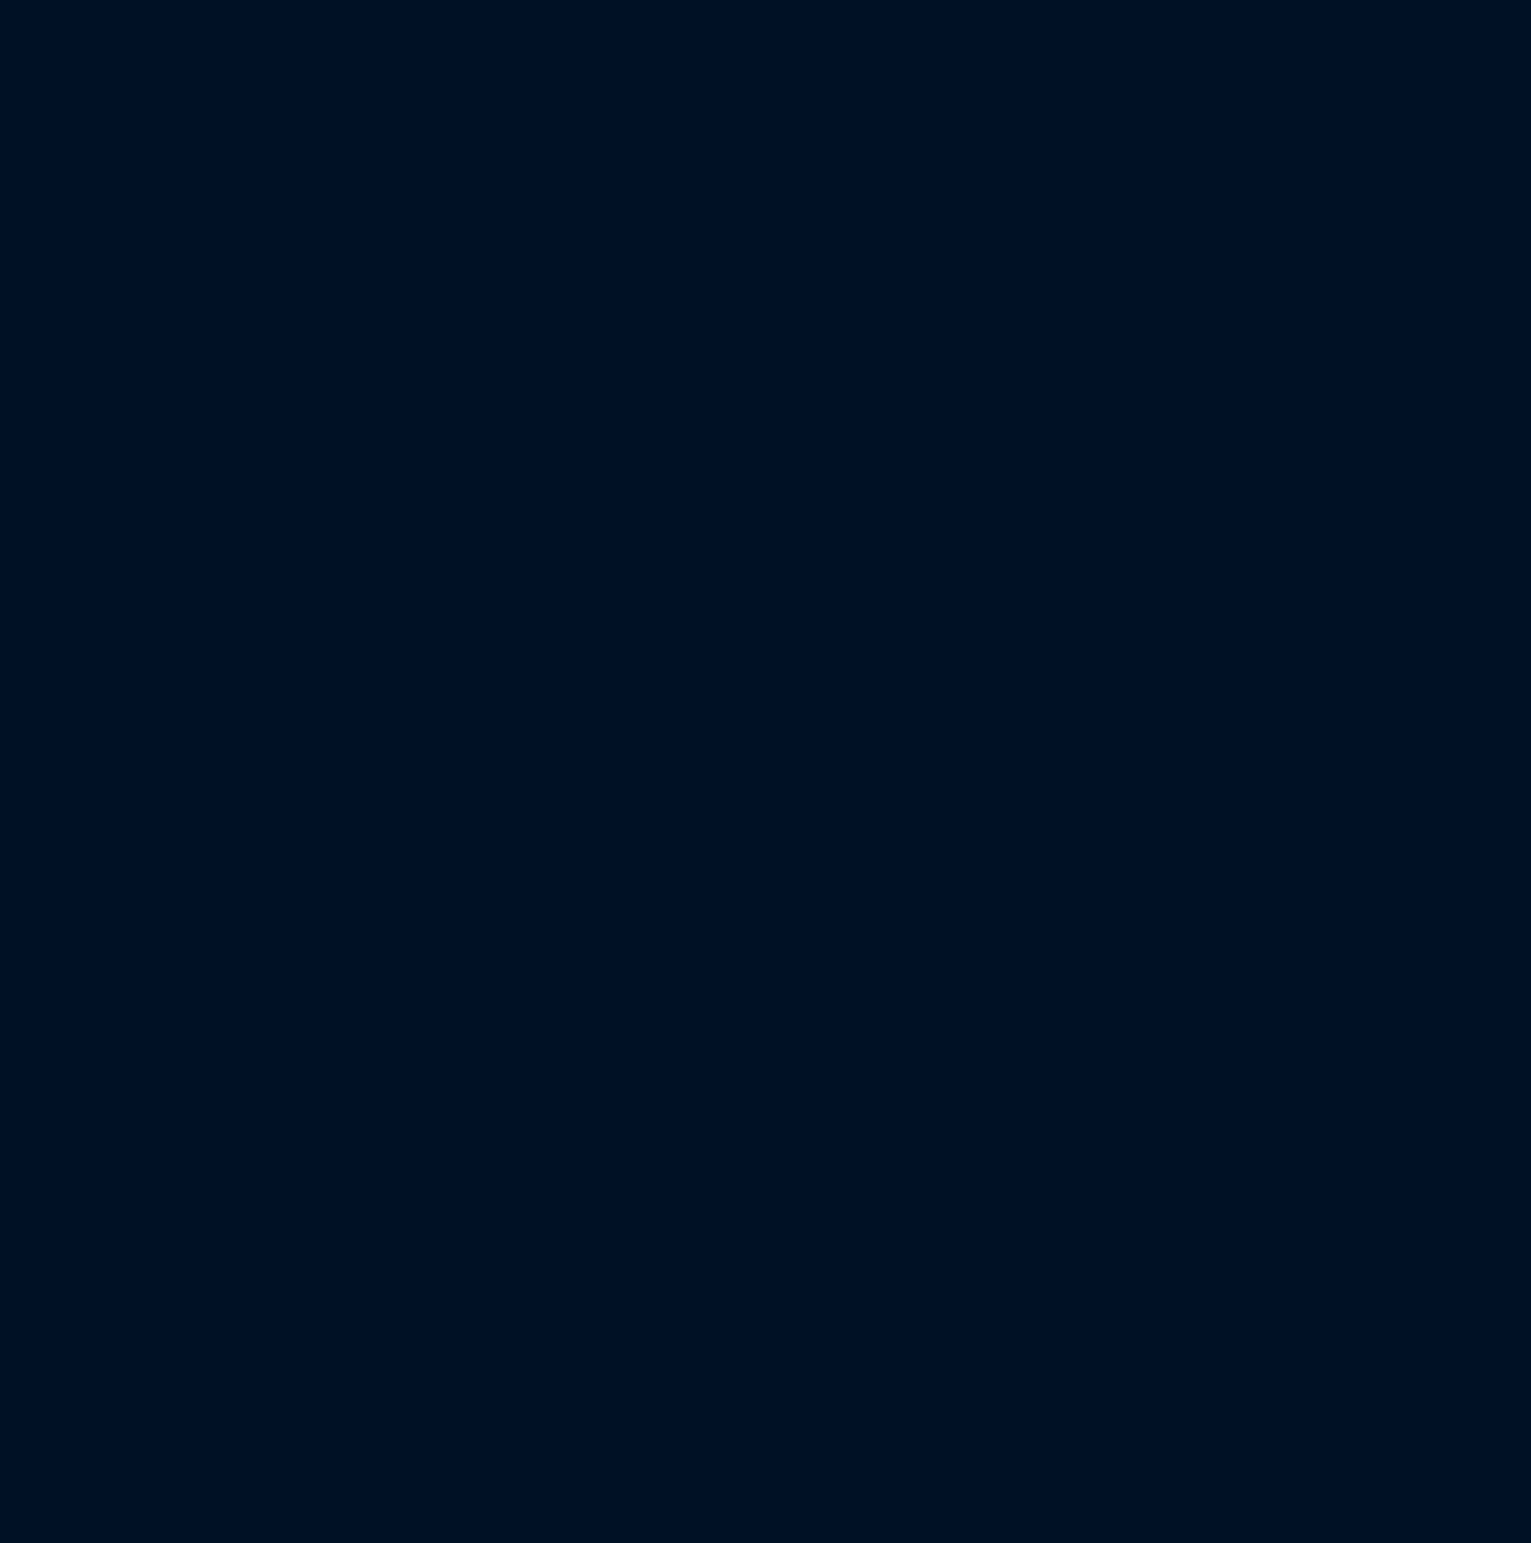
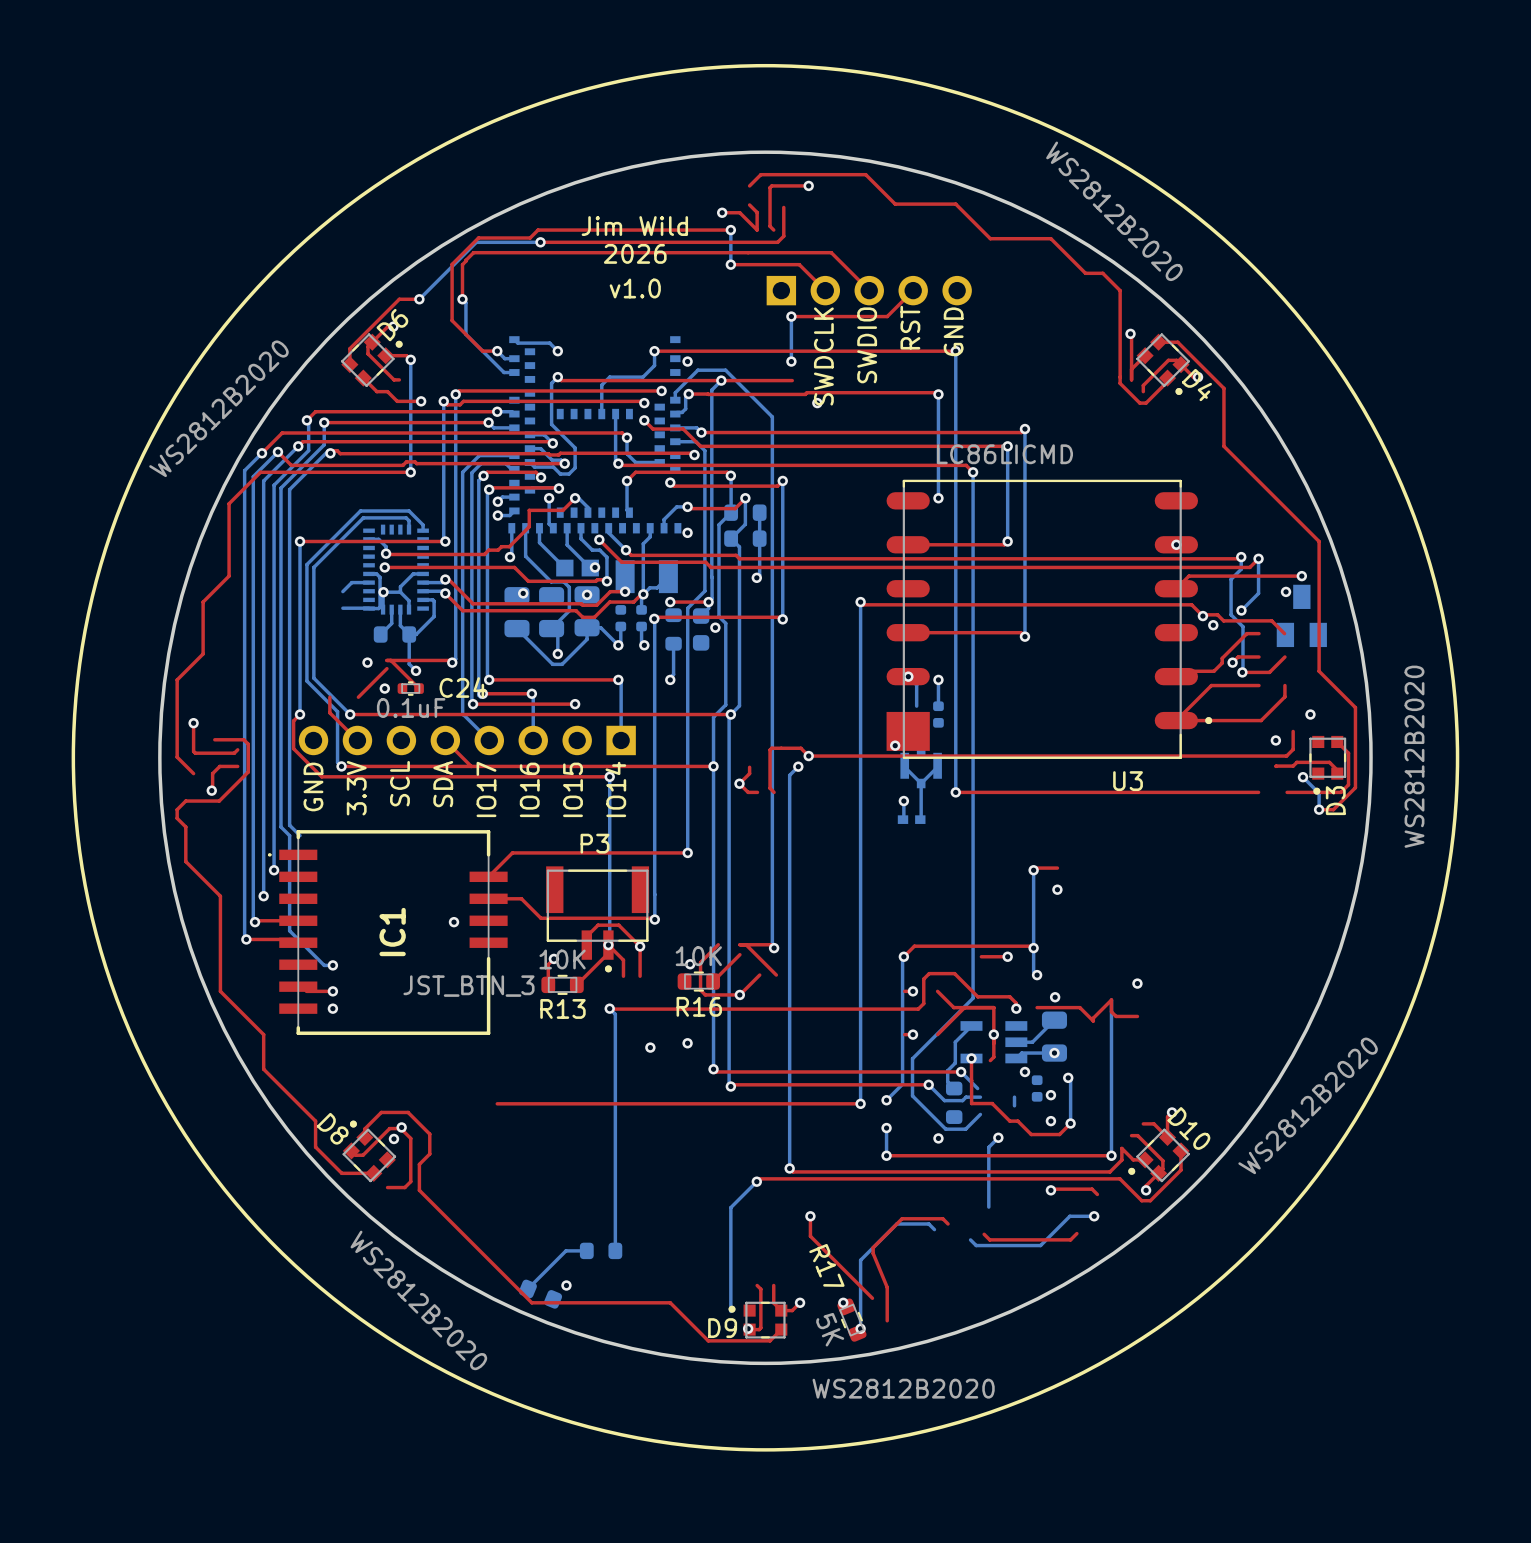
drawing: none -> [71, 63, 1460, 1452]
round board edge: none -> [158, 150, 1373, 1366]
top track: none -> (749, 185) (760, 174) (865, 174) (895, 204) (955, 204) (990, 238) (1050, 238) (1085, 273) (1102, 273) (1120, 290) (1120, 383) (1139, 403) (1146, 403) (1167, 381)
top track: none -> (808, 185) (771, 185) (770, 187) (770, 226) (773, 230)
via: none -> (808, 185)
top track: none -> (749, 204) (757, 212) (757, 230) (739, 212) (722, 212)
top track: none -> (783, 207) (783, 236) (777, 242) (540, 242)
via: none -> (722, 212)
text: none -> Jim Wild (634, 226)
top track: none -> (730, 230) (538, 230) (530, 238) (478, 238) (452, 264) (452, 320) (482, 351) (497, 351)
bottom track: none -> (730, 230) (730, 264)
via: none -> (730, 230)
bottom track: none -> (540, 242) (476, 242) (419, 299)
via: none -> (540, 242)
text: none -> 2026 (635, 253)
top track: none -> (730, 264) (799, 264) (825, 290)
via: none -> (730, 264)
text: none -> v1.0 (635, 288)
top track: none -> (869, 290) (831, 252) (473, 252) (462, 264) (462, 299)
part: none -> (869, 290)
top track: none -> (913, 290) (887, 316) (791, 316)
top track: none -> (419, 299) (399, 299) (349, 348) (349, 364)
via: none -> (419, 299)
bottom track: none -> (462, 299) (465, 302) (465, 334) (504, 372) (514, 372)
via: none -> (462, 299)
bottom track: none -> (791, 316) (791, 361)
via: none -> (791, 316)
top track: none -> (393, 326) (387, 326) (368, 346) (368, 353) (394, 379) (399, 379)
via: none -> (393, 326)
text: none -> RST (910, 327)
text: none -> GND (953, 331)
top track: none -> (1130, 333) (1131, 379)
via: none -> (1130, 333)
bottom track: none -> (515, 340) (517, 343) (549, 343) (557, 351)
top track: none -> (1158, 342) (1177, 342) (1223, 388) (1223, 446) (1319, 541) (1319, 671) (1355, 707) (1355, 787) (1333, 809) (1319, 809)
text: none -> SWDIO (867, 345)
bottom track: none -> (497, 351) (504, 358) (514, 358)
via: none -> (497, 351)
via: none -> (557, 351)
top track: none -> (654, 351) (955, 351)
bottom track: none -> (654, 351) (654, 365) (642, 377) (609, 377) (601, 385) (601, 414)
via: none -> (654, 351)
bottom track: none -> (955, 351) (955, 792)
via: none -> (955, 351)
top track: none -> (385, 355) (406, 355) (410, 359)
top track: none -> (1145, 355) (1131, 369)
text: none -> SWDCLK (823, 356)
bottom track: none -> (410, 359) (410, 472)
via: none -> (410, 359)
D6: none -> WS2812B2020 (371, 360)
via: none -> (687, 361)
via: none -> (791, 361)
D4: none -> WS2812B2020 (1163, 364)
top track: none -> (557, 377) (561, 380) (792, 380)
bottom track: none -> (557, 377) (551, 383) (551, 424) (575, 447) (575, 467) (569, 474) (560, 474) (553, 467) (534, 467) (529, 462)
via: none -> (557, 377)
top track: none -> (1198, 377) (1193, 377) (1176, 360) (1168, 360) (1143, 385) (1143, 391)
via: none -> (1198, 377)
top track: none -> (363, 378) (376, 391) (387, 391) (397, 401) (421, 401)
bottom track: none -> (721, 380) (711, 390) (712, 598) (708, 602) (708, 608) (701, 616)
via: none -> (721, 380)
top track: none -> (661, 390) (459, 390) (455, 394)
via: none -> (661, 390)
bottom track: none -> (455, 394) (455, 659) (452, 662)
via: none -> (455, 394)
top track: none -> (688, 394) (936, 392) (938, 394)
bottom track: none -> (688, 394) (685, 397) (685, 408) (682, 412) (676, 412)
via: none -> (688, 394)
bottom track: none -> (938, 394) (938, 498)
via: none -> (938, 394)
bottom track: none -> (675, 400) (675, 392) (697, 370) (725, 370) (772, 416) (772, 946) (774, 948)
via: none -> (421, 401)
top track: none -> (443, 401) (447, 404) (460, 404) (463, 401) (642, 401) (644, 403)
bottom track: none -> (443, 401) (443, 539) (445, 541)
via: none -> (443, 401)
via: none -> (644, 403)
via: none -> (817, 403)
top track: none -> (497, 411) (315, 411) (306, 420)
bottom track: none -> (497, 411) (512, 411) (514, 414)
via: none -> (497, 411)
bottom track: none -> (615, 414) (615, 460) (618, 463)
bottom track: none -> (306, 420) (308, 422) (308, 450) (274, 485) (274, 870)
via: none -> (306, 420)
top track: none -> (644, 420) (652, 429) (683, 429) (700, 446) (1007, 446)
via: none -> (644, 420)
top track: none -> (324, 422) (488, 422)
bottom track: none -> (324, 422) (324, 444) (280, 488) (280, 826) (289, 835) (289, 930) (324, 965) (332, 965)
via: none -> (324, 422)
bottom track: none -> (488, 422) (493, 427) (514, 427)
via: none -> (488, 422)
bottom track: none -> (675, 427) (696, 427) (701, 432)
top track: none -> (1024, 429) (1021, 432) (701, 432)
bottom track: none -> (1024, 429) (1024, 636)
via: none -> (1024, 429)
via: none -> (701, 432)
bottom track: none -> (529, 434) (544, 434) (552, 443)
part: none -> (594, 434)
top track: none -> (627, 437) (622, 433) (282, 433) (261, 453)
bottom track: none -> (627, 437) (627, 453) (635, 462) (659, 462)
via: none -> (627, 437)
bottom track: none -> (675, 441) (695, 441) (704, 450) (704, 591) (687, 608) (687, 852)
top track: none -> (552, 443) (551, 441) (302, 441) (298, 446)
via: none -> (552, 443)
bottom track: none -> (298, 446) (263, 480) (263, 896)
via: none -> (298, 446)
bottom track: none -> (1007, 446) (1007, 541)
via: none -> (1007, 446)
bottom track: none -> (529, 448) (540, 448) (552, 460) (561, 460) (564, 463)
top track: none -> (330, 450) (337, 450) (340, 453) (558, 454) (560, 453) (692, 453) (694, 454)
top track: none -> (277, 451) (291, 465) (402, 465) (406, 461) (416, 463) (564, 463)
bottom track: none -> (277, 451) (253, 476) (253, 920) (255, 922)
via: none -> (277, 451)
bottom track: none -> (261, 453) (244, 470) (244, 937) (246, 939)
via: none -> (261, 453)
bottom track: none -> (330, 453) (330, 450) (328, 450) (289, 489) (289, 825) (300, 835)
via: none -> (330, 453)
via: none -> (694, 454)
bottom track: none -> (514, 455) (479, 455) (462, 472) (462, 714) (489, 740)
via: none -> (564, 463)
top track: none -> (618, 463) (620, 465) (966, 465) (973, 472)
via: none -> (618, 463)
bottom track: none -> (511, 469) (505, 463) (481, 463) (471, 472) (473, 704)
top track: none -> (410, 472) (260, 472) (229, 503) (229, 576) (203, 602) (203, 653) (177, 679) (177, 757) (193, 773)
via: none -> (410, 472)
bottom track: none -> (973, 472) (973, 998) (912, 1058) (912, 1095) (945, 1129) (965, 1129) (980, 1114)
via: none -> (973, 472)
top track: none -> (483, 475) (487, 472) (535, 472) (541, 477)
bottom track: none -> (483, 475) (478, 480) (478, 695) (480, 696) (482, 693)
via: none -> (483, 475)
top track: none -> (730, 475) (727, 472) (635, 472) (627, 480)
bottom track: none -> (730, 475) (731, 512) (718, 524) (718, 616) (725, 623) (725, 704) (713, 717) (713, 1069)
via: none -> (730, 475)
via: none -> (541, 477)
bottom track: none -> (627, 480) (627, 510) (629, 512)
via: none -> (627, 480)
top track: none -> (782, 480) (777, 486) (673, 486) (670, 482)
bottom track: none -> (782, 480) (782, 619)
via: none -> (782, 480)
via: none -> (670, 482)
top track: none -> (558, 488) (490, 487) (489, 489)
via: none -> (558, 488)
bottom track: none -> (489, 489) (487, 491) (487, 678) (489, 679)
via: none -> (489, 489)
bottom track: none -> (514, 497) (502, 497) (497, 501)
bottom track: none -> (549, 498) (549, 524) (553, 528)
via: none -> (549, 498)
top track: none -> (575, 498) (563, 510) (529, 510) (529, 526) (509, 546) (501, 546) (498, 550) (488, 550) (484, 554) (386, 553)
bottom track: none -> (575, 498) (578, 498) (587, 507) (587, 512)
via: none -> (575, 498)
top track: none -> (745, 498) (735, 508) (689, 508) (687, 506)
bottom track: none -> (745, 498) (745, 524) (731, 538) (739, 547) (739, 705) (729, 716) (729, 1084) (730, 1086)
via: none -> (745, 498)
via: none -> (938, 498)
via: none -> (497, 501)
bottom track: none -> (687, 506) (676, 506) (664, 519) (664, 528)
via: none -> (687, 506)
bottom track: none -> (514, 510) (509, 515) (497, 515)
part: none -> (745, 512)
bottom track: none -> (759, 512) (759, 574) (756, 577)
via: none -> (497, 515)
bottom track: none -> (511, 528) (511, 555) (509, 557)
bottom track: none -> (525, 528) (525, 556) (551, 581) (563, 581) (569, 587) (569, 610) (551, 628)
bottom track: none -> (539, 528) (539, 542) (564, 568)
bottom track: none -> (567, 528) (567, 544) (590, 568)
bottom track: none -> (581, 528) (581, 538) (592, 550) (599, 550) (606, 557) (606, 581)
bottom track: none -> (608, 528) (608, 532) (625, 550)
bottom track: none -> (650, 528) (650, 536) (643, 543) (643, 594)
bottom track: none -> (409, 529) (409, 520) (406, 517) (363, 517) (313, 567) (313, 678) (350, 714)
bottom track: none -> (423, 530) (423, 525) (409, 510) (360, 510) (306, 564) (306, 681) (337, 711) (337, 762) (341, 766)
via: none -> (687, 532)
part: none -> (745, 538)
bottom track: none -> (369, 539) (378, 539) (386, 546) (386, 553)
top track: none -> (599, 539) (621, 562) (705, 562) (710, 567) (1249, 567) (1258, 558)
via: none -> (599, 539)
top track: none -> (300, 541) (445, 541)
bottom track: none -> (300, 541) (300, 714)
via: none -> (300, 541)
via: none -> (445, 541)
top track: none -> (1007, 541) (1004, 544) (908, 544)
via: none -> (1007, 541)
via: none -> (1176, 544)
top track: none -> (625, 550) (631, 555) (736, 555) (739, 558) (1239, 558) (1241, 557)
via: none -> (625, 550)
via: none -> (386, 553)
via: none -> (509, 557)
bottom track: none -> (1241, 557) (1241, 569) (1231, 579) (1231, 614) (1242, 626) (1242, 672)
via: none -> (1241, 557)
bottom track: none -> (1258, 558) (1258, 593) (1241, 610)
via: none -> (1258, 558)
top track: none -> (384, 567) (514, 567) (528, 581) (597, 579) (606, 581)
via: none -> (384, 567)
via: none -> (595, 567)
part: none -> (577, 568)
part: none -> (396, 569)
bottom track: none -> (369, 573) (376, 573) (380, 577) (380, 607) (369, 608)
bottom track: none -> (423, 573) (413, 573) (400, 586) (400, 592)
part: none -> (646, 576)
bottom track: none -> (668, 576) (657, 587) (649, 587) (641, 596) (641, 609)
top track: none -> (1301, 576) (1189, 576) (1176, 588)
via: none -> (1301, 576)
via: none -> (756, 577)
top track: none -> (445, 579) (448, 579) (473, 603) (596, 605) (610, 591) (625, 591)
bottom track: none -> (445, 579) (442, 582) (423, 582)
via: none -> (445, 579)
via: none -> (606, 581)
bottom track: none -> (369, 582) (351, 582) (342, 591)
bottom track: none -> (423, 591) (443, 591) (445, 593)
via: none -> (625, 591)
via: none -> (1286, 591)
via: none -> (383, 592)
bottom track: none -> (400, 592) (409, 600) (409, 609)
bottom track: none -> (400, 592) (383, 592) (383, 609)
top track: none -> (445, 593) (462, 610) (576, 610) (582, 617) (594, 617) (609, 602) (633, 602) (643, 594)
via: none -> (445, 593)
via: none -> (523, 593)
via: none -> (587, 594)
via: none -> (643, 594)
bottom track: none -> (423, 599) (434, 601) (434, 616) (416, 634) (409, 634)
top track: none -> (670, 602) (708, 602)
via: none -> (670, 602)
via: none -> (708, 602)
top track: none -> (860, 602) (863, 604) (1191, 604) (1202, 616) (1217, 614) (1223, 620) (1271, 620) (1284, 633)
bottom track: none -> (860, 602) (860, 1103)
via: none -> (860, 602)
bottom track: none -> (342, 608) (368, 608)
bottom track: none -> (391, 609) (391, 623) (380, 634)
bottom track: none -> (400, 609) (400, 625) (409, 634)
via: none -> (1241, 610)
part: none -> (587, 611)
part: none -> (516, 612)
part: none -> (551, 612)
part: none -> (1301, 615)
via: none -> (1202, 616)
part: none -> (620, 618)
part: none -> (641, 618)
top track: none -> (654, 618) (655, 617) (780, 617) (782, 619)
bottom track: none -> (654, 618) (654, 894)
via: none -> (654, 618)
via: none -> (782, 619)
U3: none -> LC86LICMD (1049, 619)
via: none -> (1213, 625)
bottom track: none -> (620, 626) (620, 642) (618, 645) (600, 627) (587, 627) (587, 639) (562, 664) (552, 664) (516, 628)
bottom track: none -> (641, 626) (641, 642) (644, 645)
via: none -> (715, 627)
part: none -> (673, 629)
part: none -> (701, 629)
top track: none -> (908, 632) (1021, 632) (1024, 636)
top track: none -> (1258, 633) (1246, 633) (1222, 658) (1222, 663) (1213, 671) (1181, 671)
part: none -> (394, 634)
bottom track: none -> (409, 634) (409, 664) (416, 670)
bottom track: none -> (557, 634) (557, 653)
via: none -> (1024, 636)
bottom track: none -> (673, 643) (673, 674) (670, 679)
via: none -> (618, 645)
via: none -> (644, 645)
via: none -> (557, 653)
top track: none -> (1258, 656) (1238, 656) (1232, 662)
top track: none -> (1284, 656) (1269, 672) (1242, 672)
top track: none -> (386, 660) (450, 660) (452, 662)
top track: none -> (390, 660) (419, 688)
via: none -> (367, 662)
via: none -> (452, 662)
via: none -> (1232, 662)
top track: none -> (386, 668) (358, 697)
via: none -> (416, 670)
via: none -> (1242, 672)
bottom track: none -> (908, 676) (916, 684) (916, 706)
via: none -> (908, 676)
top track: none -> (489, 679) (618, 679)
via: none -> (489, 679)
bottom track: none -> (618, 679) (621, 682) (621, 740)
via: none -> (618, 679)
via: none -> (670, 679)
bottom track: none -> (938, 679) (938, 706)
via: none -> (938, 679)
top track: none -> (1258, 685) (1211, 685) (1176, 720) (1261, 720) (1284, 696) (1284, 685)
via: none -> (384, 688)
C24: none -> 0.1uF (410, 688)
top track: none -> (482, 693) (531, 693)
via: none -> (482, 693)
bottom track: none -> (531, 693) (533, 740)
via: none -> (531, 693)
top track: none -> (329, 697) (329, 712) (357, 740)
top track: none -> (473, 704) (575, 704)
via: none -> (473, 704)
via: none -> (575, 704)
top track: none -> (300, 714) (293, 720) (293, 748) (321, 776) (609, 776)
via: none -> (300, 714)
top track: none -> (350, 714) (730, 714)
via: none -> (350, 714)
via: none -> (730, 714)
part: none -> (938, 714)
via: none -> (1310, 714)
top track: none -> (193, 723) (193, 751) (195, 753) (234, 753) (237, 749)
via: none -> (193, 723)
top track: none -> (1293, 731) (1293, 749) (1286, 756) (808, 756) (800, 748) (771, 748) (770, 749) (770, 788) (774, 792)
top track: none -> (214, 739) (243, 739) (248, 744) (248, 772) (219, 801) (185, 801) (177, 809) (177, 818) (185, 826) (185, 861) (220, 896) (220, 991) (263, 1034) (263, 1069) (315, 1121) (315, 1147) (341, 1173) (373, 1173)
top track: none -> (445, 740) (471, 766)
part: none -> (467, 740)
via: none -> (1275, 740)
top track: none -> (1337, 741) (1348, 753) (1348, 784) (1341, 792) (1287, 792)
via: none -> (895, 745)
via: none -> (808, 756)
part: none -> (921, 765)
D3: none -> WS2812B2020 (1327, 765)
top track: none -> (237, 766) (219, 766) (212, 773) (211, 790)
top track: none -> (341, 766) (713, 766)
via: none -> (341, 766)
via: none -> (713, 766)
bottom track: none -> (798, 766) (789, 775) (789, 1168)
via: none -> (798, 766)
top track: none -> (1275, 766) (1293, 766) (1296, 762) (1329, 762) (1337, 770)
top track: none -> (749, 767) (749, 773) (739, 783) (748, 792) (757, 792)
bottom track: none -> (904, 767) (921, 783)
bottom track: none -> (937, 767) (921, 783)
bottom track: none -> (609, 776) (608, 945)
via: none -> (609, 776)
bottom track: none -> (1303, 777) (1319, 793) (1319, 809)
via: none -> (1303, 777)
text: none -> SCL (399, 783)
via: none -> (739, 783)
bottom track: none -> (921, 783) (921, 818)
text: none -> SDA (443, 784)
text: none -> GND (313, 786)
text: none -> 3.3V (356, 788)
text: none -> IO17 (486, 789)
text: none -> IO16 (529, 789)
text: none -> IO15 (573, 789)
text: none -> IO14 (615, 789)
via: none -> (211, 790)
top track: none -> (955, 792) (1258, 792)
via: none -> (955, 792)
bottom track: none -> (903, 801) (903, 818)
via: none -> (903, 801)
via: none -> (1319, 809)
part: none -> (911, 819)
top track: none -> (687, 852) (512, 852) (488, 876)
via: none -> (687, 852)
top track: none -> (1057, 868) (1035, 868) (1033, 870)
via: none -> (274, 870)
bottom track: none -> (1033, 870) (1033, 971) (1037, 975)
via: none -> (1033, 870)
via: none -> (1057, 889)
bottom track: none -> (654, 894) (654, 919)
via: none -> (263, 896)
top track: none -> (488, 898) (521, 898) (540, 918) (654, 919)
P3: none -> JST_BTN_3 (597, 919)
via: none -> (654, 919)
top track: none -> (298, 920) (255, 922)
via: none -> (255, 922)
via: none -> (454, 922)
IC1: none -> (387, 932)
top track: none -> (586, 936) (598, 925) (618, 925) (640, 946) (640, 976)
top track: none -> (246, 939) (294, 939)
via: none -> (246, 939)
top track: none -> (718, 944) (700, 962) (700, 990) (705, 994) (739, 994) (759, 975)
top track: none -> (739, 944) (770, 944) (774, 948)
top track: none -> (746, 944) (776, 975)
top track: none -> (608, 945) (623, 960) (623, 976)
via: none -> (608, 945)
via: none -> (640, 946)
via: none -> (774, 948)
top track: none -> (1033, 948) (1031, 946) (914, 946) (903, 956)
via: none -> (1033, 948)
top track: none -> (608, 953) (576, 984)
top track: none -> (739, 954) (713, 981)
bottom track: none -> (903, 956) (902, 1084) (886, 1100)
via: none -> (903, 956)
top track: none -> (981, 956) (1007, 956)
via: none -> (1007, 956)
top track: none -> (553, 958) (548, 964) (548, 984)
via: none -> (553, 958)
via: none -> (690, 964)
via: none -> (332, 965)
via: none -> (1037, 975)
R16: none -> 10K (698, 981)
via: none -> (1137, 983)
R13: none -> 10K (562, 984)
top track: none -> (302, 986) (306, 991) (332, 991)
via: none -> (332, 991)
top track: none -> (904, 991) (912, 991)
via: none -> (912, 991)
top track: none -> (937, 991) (953, 1007) (993, 1007) (993, 1057) (990, 1060)
via: none -> (739, 994)
via: none -> (1055, 997)
bottom track: none -> (1111, 1000) (1111, 1155)
top track: none -> (964, 1007) (937, 1034)
top track: none -> (1037, 1007) (1079, 1007) (1093, 1021) (1093, 1018) (1111, 1000) (1111, 1011) (1116, 1016) (1137, 1016)
via: none -> (332, 1008)
top track: none -> (609, 1008) (918, 1009) (923, 1003) (923, 979) (929, 973) (954, 973) (977, 996) (1009, 996) (1016, 1003) (1016, 1008)
bottom track: none -> (609, 1008) (615, 1014) (615, 1250)
via: none -> (609, 1008)
via: none -> (1016, 1008)
bottom track: none -> (1054, 1020) (1032, 1042) (1016, 1042)
bottom track: none -> (971, 1025) (955, 1042) (955, 1063) (947, 1070) (947, 1082) (954, 1088)
top track: none -> (904, 1034) (912, 1034)
via: none -> (912, 1034)
via: none -> (993, 1034)
part: none -> (1054, 1036)
part: none -> (993, 1042)
via: none -> (687, 1043)
via: none -> (650, 1047)
bottom track: none -> (1054, 1053) (1021, 1053) (1016, 1058)
via: none -> (1054, 1053)
top track: none -> (971, 1058) (971, 1080)
via: none -> (971, 1058)
top track: none -> (713, 1069) (716, 1071) (961, 1071)
via: none -> (713, 1069)
bottom track: none -> (961, 1071) (977, 1088)
via: none -> (961, 1071)
via: none -> (1024, 1071)
bottom track: none -> (1068, 1077) (1070, 1080) (1070, 1123)
via: none -> (1068, 1077)
top track: none -> (971, 1080) (971, 1103) (992, 1103) (1009, 1121) (1017, 1121) (1031, 1134) (1059, 1134) (1070, 1123)
top track: none -> (928, 1084) (732, 1084) (730, 1086)
bottom track: none -> (928, 1084) (944, 1100) (962, 1100) (966, 1097) (980, 1097)
via: none -> (928, 1084)
via: none -> (730, 1086)
part: none -> (1037, 1088)
via: none -> (1050, 1095)
bottom track: none -> (1014, 1097) (1014, 1105)
via: none -> (886, 1100)
part: none -> (954, 1102)
top track: none -> (497, 1103) (860, 1103)
via: none -> (860, 1103)
top track: none -> (1172, 1112) (1167, 1116) (1167, 1137) (1153, 1123) (1143, 1123)
via: none -> (1172, 1112)
via: none -> (1050, 1121)
via: none -> (1070, 1123)
via: none -> (401, 1127)
top track: none -> (400, 1128) (389, 1128) (363, 1155) (355, 1155) (351, 1150)
top track: none -> (400, 1128) (410, 1138) (410, 1181) (404, 1187) (387, 1187)
bottom track: none -> (886, 1128) (886, 1155)
via: none -> (886, 1128)
top track: none -> (1131, 1135) (1137, 1135) (1162, 1160) (1162, 1169) (1146, 1185) (1146, 1190)
top track: none -> (364, 1137) (364, 1128) (381, 1112) (408, 1112) (429, 1134) (429, 1154) (419, 1164) (419, 1190) (531, 1302) (670, 1302) (708, 1340) (770, 1340) (781, 1329)
bottom track: none -> (998, 1137) (988, 1147) (988, 1207)
via: none -> (998, 1137)
via: none -> (393, 1138)
via: none -> (938, 1138)
top track: none -> (1180, 1150) (1180, 1170) (1150, 1200) (1141, 1200) (1119, 1178) (759, 1178) (756, 1181)
D8: none -> WS2812B2020 (369, 1151)
top track: none -> (886, 1155) (1111, 1155)
via: none -> (886, 1155)
via: none -> (1111, 1155)
D10: none -> WS2812B2020 (1159, 1155)
top track: none -> (1145, 1159) (1133, 1159) (1121, 1148) (1121, 1160) (1109, 1171) (793, 1171) (789, 1168)
via: none -> (789, 1168)
bottom track: none -> (756, 1181) (730, 1207) (730, 1311)
via: none -> (756, 1181)
top track: none -> (1050, 1190) (1092, 1189) (1097, 1194)
via: none -> (1050, 1190)
via: none -> (1146, 1190)
top track: none -> (810, 1216) (810, 1236) (872, 1298)
via: none -> (810, 1216)
bottom track: none -> (1094, 1216) (1069, 1216) (1040, 1245) (976, 1245) (970, 1239)
via: none -> (1094, 1216)
top track: none -> (948, 1223) (942, 1218) (902, 1218) (873, 1247) (873, 1253) (887, 1287) (887, 1320)
bottom track: none -> (934, 1229) (928, 1223) (896, 1223) (860, 1260) (860, 1328)
top track: none -> (1076, 1233) (1070, 1239) (989, 1239) (984, 1234)
bottom track: none -> (586, 1250) (565, 1250) (527, 1288)
part: none -> (601, 1250)
via: none -> (566, 1285)
top track: none -> (757, 1285) (760, 1289) (760, 1327) (749, 1329)
top track: none -> (773, 1285) (773, 1303) (781, 1310) (792, 1310) (800, 1302)
part: none -> (540, 1294)
via: none -> (800, 1302)
via: none -> (843, 1302)
D9: none -> WS2812B2020 (757, 1320)
R17: none -> 5K (851, 1320)
via: none -> (748, 1328)
via: none -> (860, 1328)

